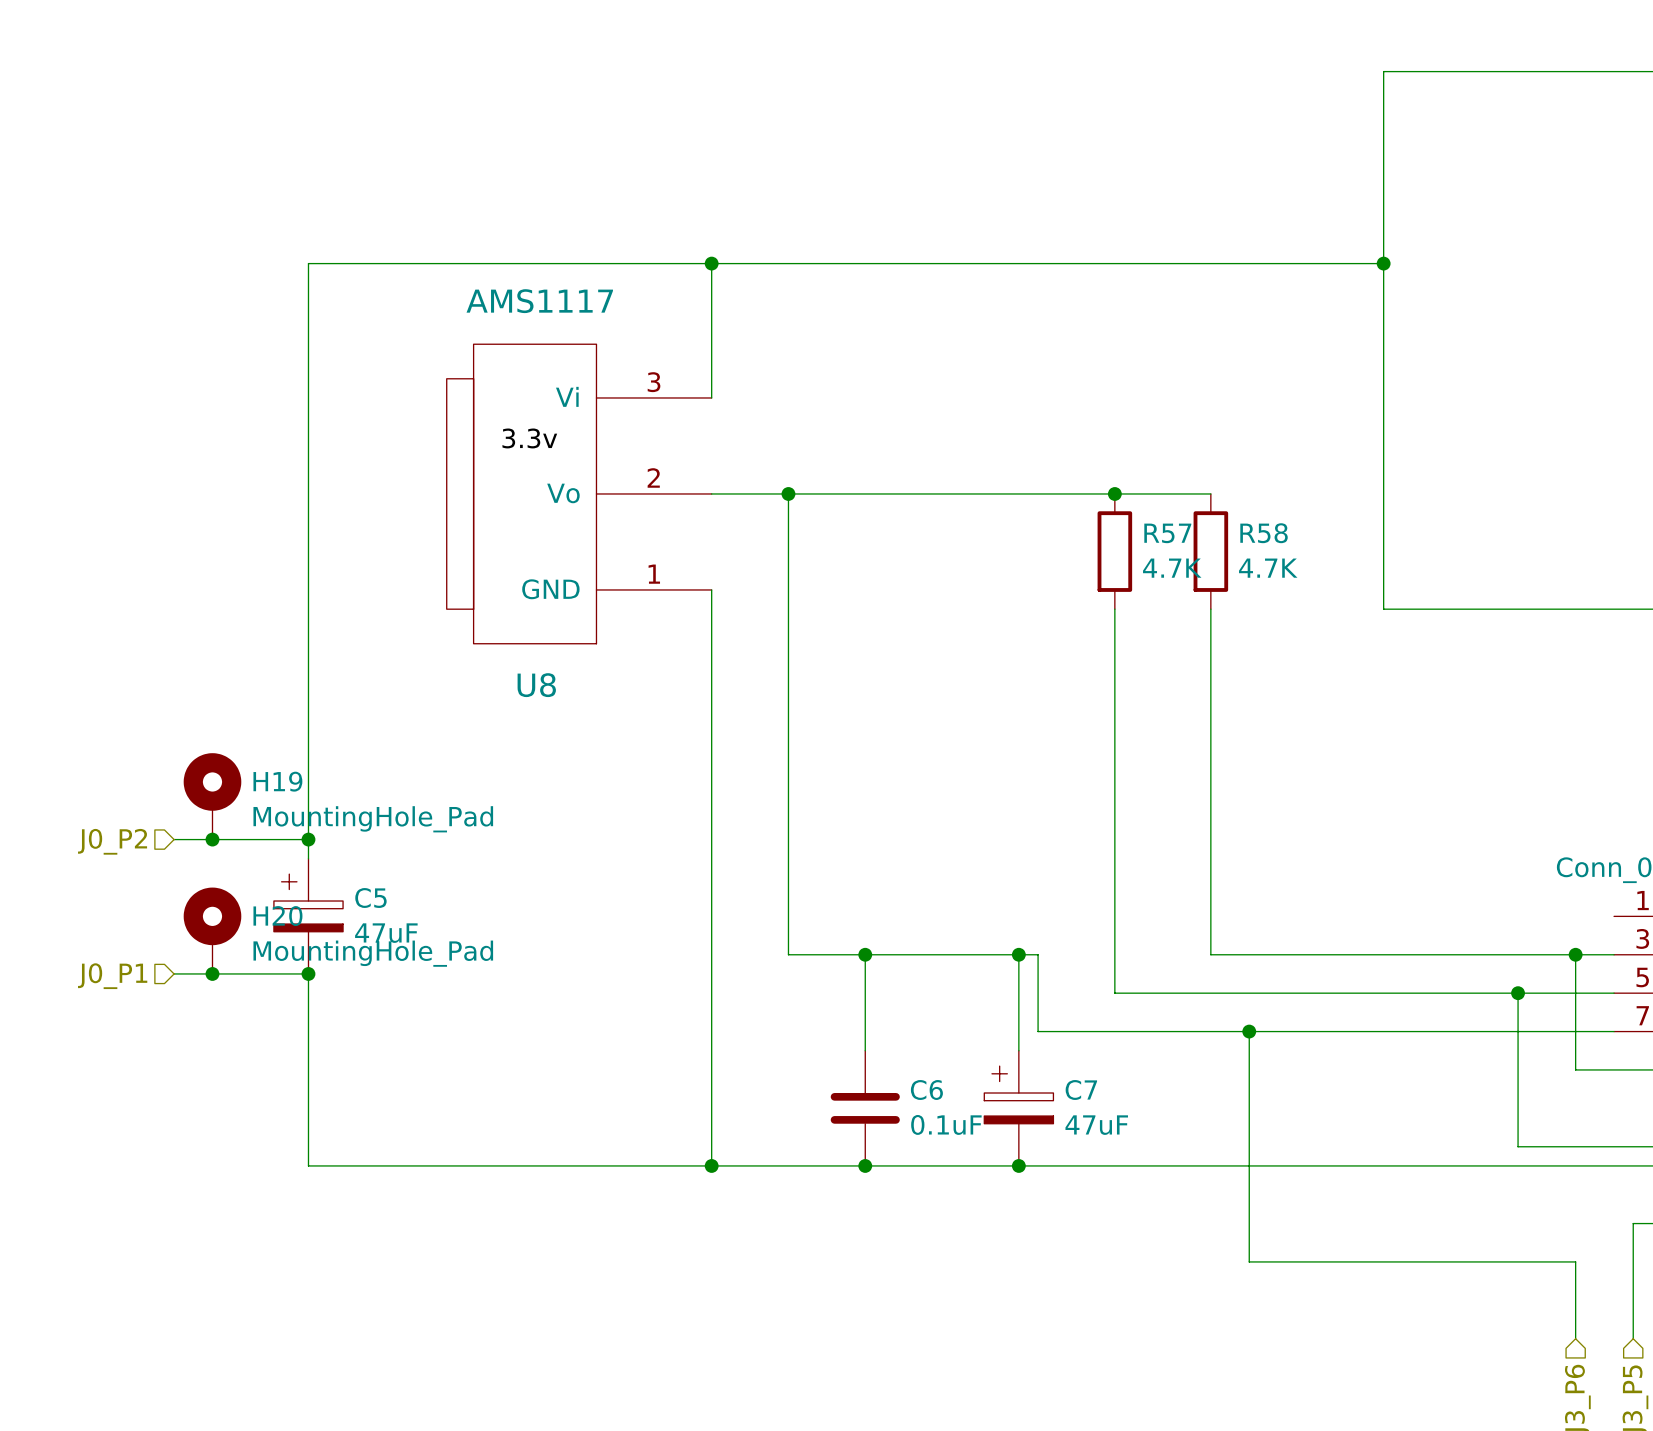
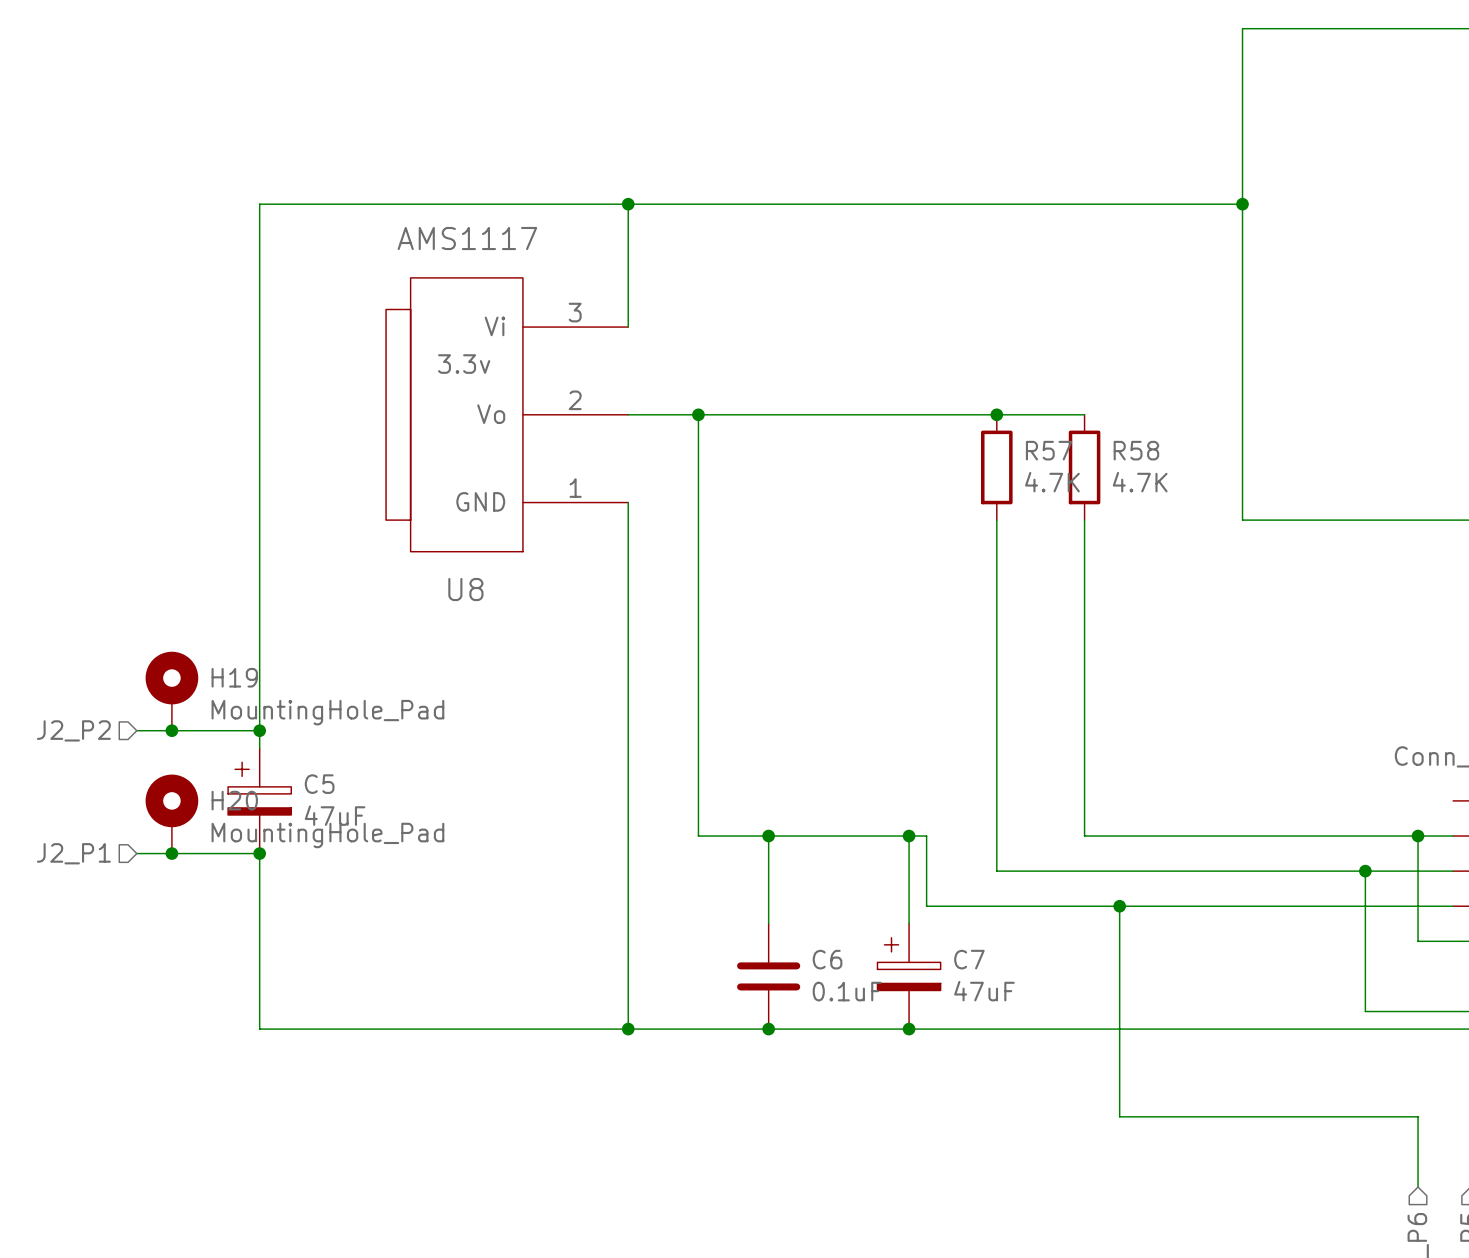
hierarchical label: J0_P2 (112, 841) -> J2_P2 (73, 730)
hierarchical label: J0_P1 (112, 976) -> J2_P1 (73, 853)

